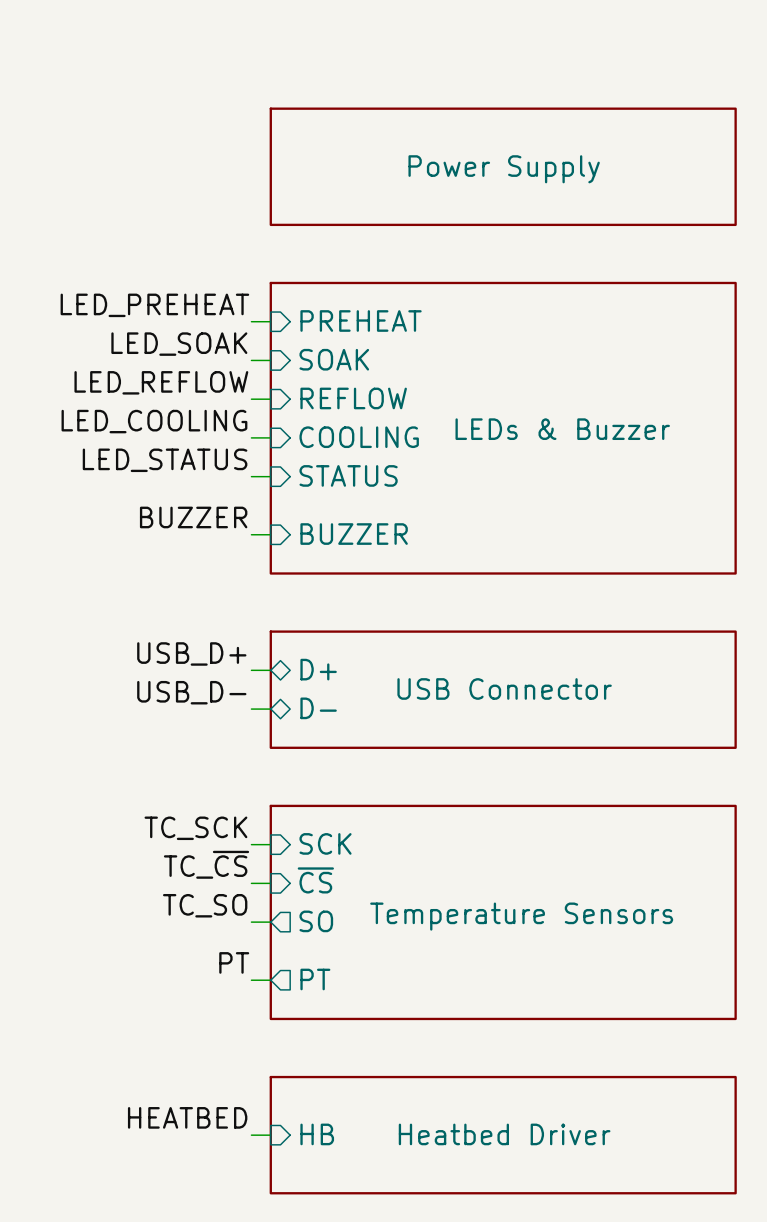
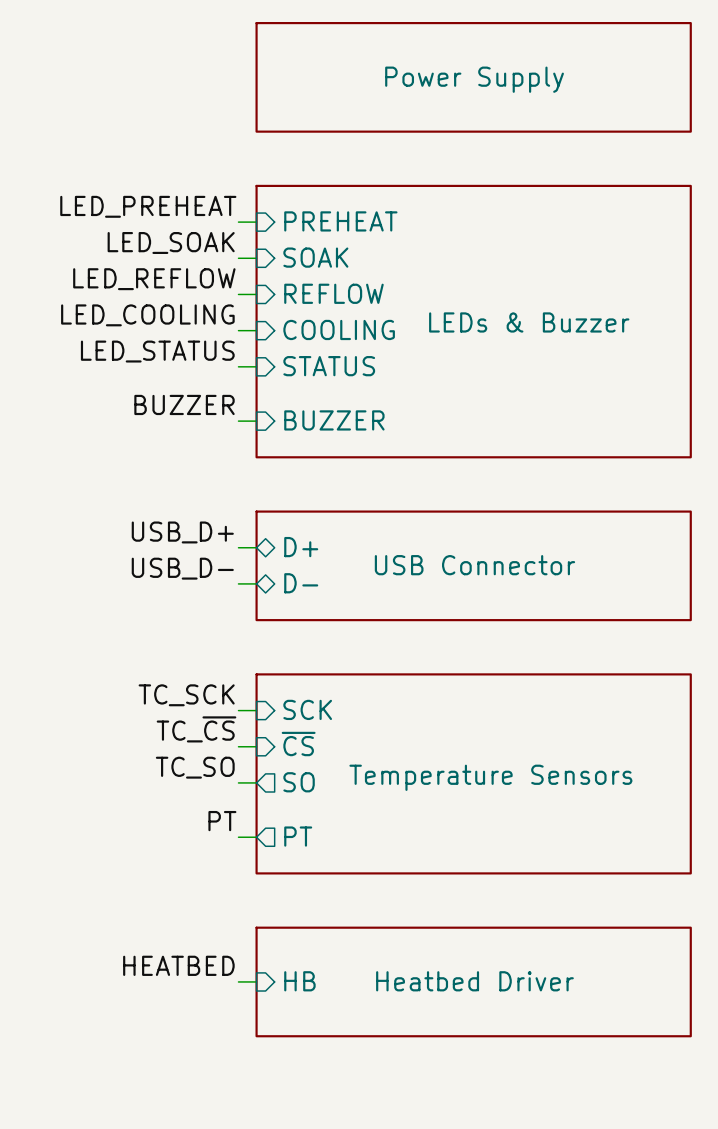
sheet Power Supply position: (503, 166) -> (473, 77)
label: none -> LED_PREHEAT (148, 206)
sheet pin: none -> PREHEAT (340, 221)
label: none -> LED_SOAK (171, 243)
sheet pin: none -> SOAK (315, 257)
label: LED_PREHEAT (154, 305) -> LED_REFLOW (154, 279)
sheet pin: PREHEAT (361, 320) -> REFLOW (333, 293)
label: LED_SOAK (179, 344) -> LED_COOLING (147, 315)
sheet pin: SOAK (334, 359) -> COOLING (339, 329)
label: LED_REFLOW (161, 382) -> LED_STATUS (157, 351)
sheet pin: REFLOW (353, 398) -> STATUS (329, 366)
label: LED_COOLING (154, 421) -> none
sheet LEDs & Buzzer position: (503, 428) -> (473, 321)
wire: (251, 437) (270, 437) -> (238, 258) (256, 258)
sheet pin: COOLING (359, 437) -> none
label: LED_STATUS (165, 460) -> none
sheet pin: STATUS (348, 475) -> none
wire: (251, 476) (270, 476) -> (238, 222) (256, 222)
label position: BUZZER (193, 517) -> BUZZER (184, 404)
wire: (251, 534) (270, 534) -> (238, 421) (256, 421)
sheet pin position: BUZZER (354, 534) -> BUZZER (334, 420)
label position: USB_D+ (191, 653) -> USB_D+ (182, 532)
sheet pin position: D+ (318, 669) -> D+ (301, 547)
wire: (251, 670) (270, 670) -> (238, 547) (256, 547)
sheet USB Connector position: (503, 689) -> (473, 565)
label position: USB_D- (191, 692) -> USB_D- (182, 568)
sheet pin position: D- (318, 708) -> D- (301, 583)
wire: (251, 709) (270, 709) -> (238, 583) (256, 583)
label: none -> TC_SCK (186, 695)
sheet pin: none -> SCK (307, 709)
label: TC_SCK (195, 828) -> TC_SO (195, 767)
sheet pin shape: input (325, 843) -> output (299, 782)
sheet pin: SCK (325, 843) -> SO (299, 782)
label position: TC_~{CS} (206, 864) -> TC_~{CS} (196, 729)
sheet pin position: ~{CS} (315, 880) -> ~{CS} (298, 744)
wire: (251, 883) (270, 883) -> (238, 746) (256, 746)
label: TC_SO (205, 905) -> none
sheet Temperature Sensors position: (503, 912) -> (473, 773)
sheet pin: SO (316, 921) -> none
wire: (251, 922) (270, 922) -> (238, 710) (256, 710)
label position: PT (234, 962) -> PT (222, 821)
sheet pin position: PT (315, 979) -> PT (298, 836)
wire: (251, 980) (270, 980) -> (238, 837) (256, 837)
label position: HEATBED (187, 1117) -> HEATBED (178, 965)
sheet pin position: HB (317, 1134) -> HB (299, 981)
wire: (251, 1135) (270, 1135) -> (238, 981) (256, 981)
sheet Heatbed Driver position: (503, 1135) -> (473, 981)

